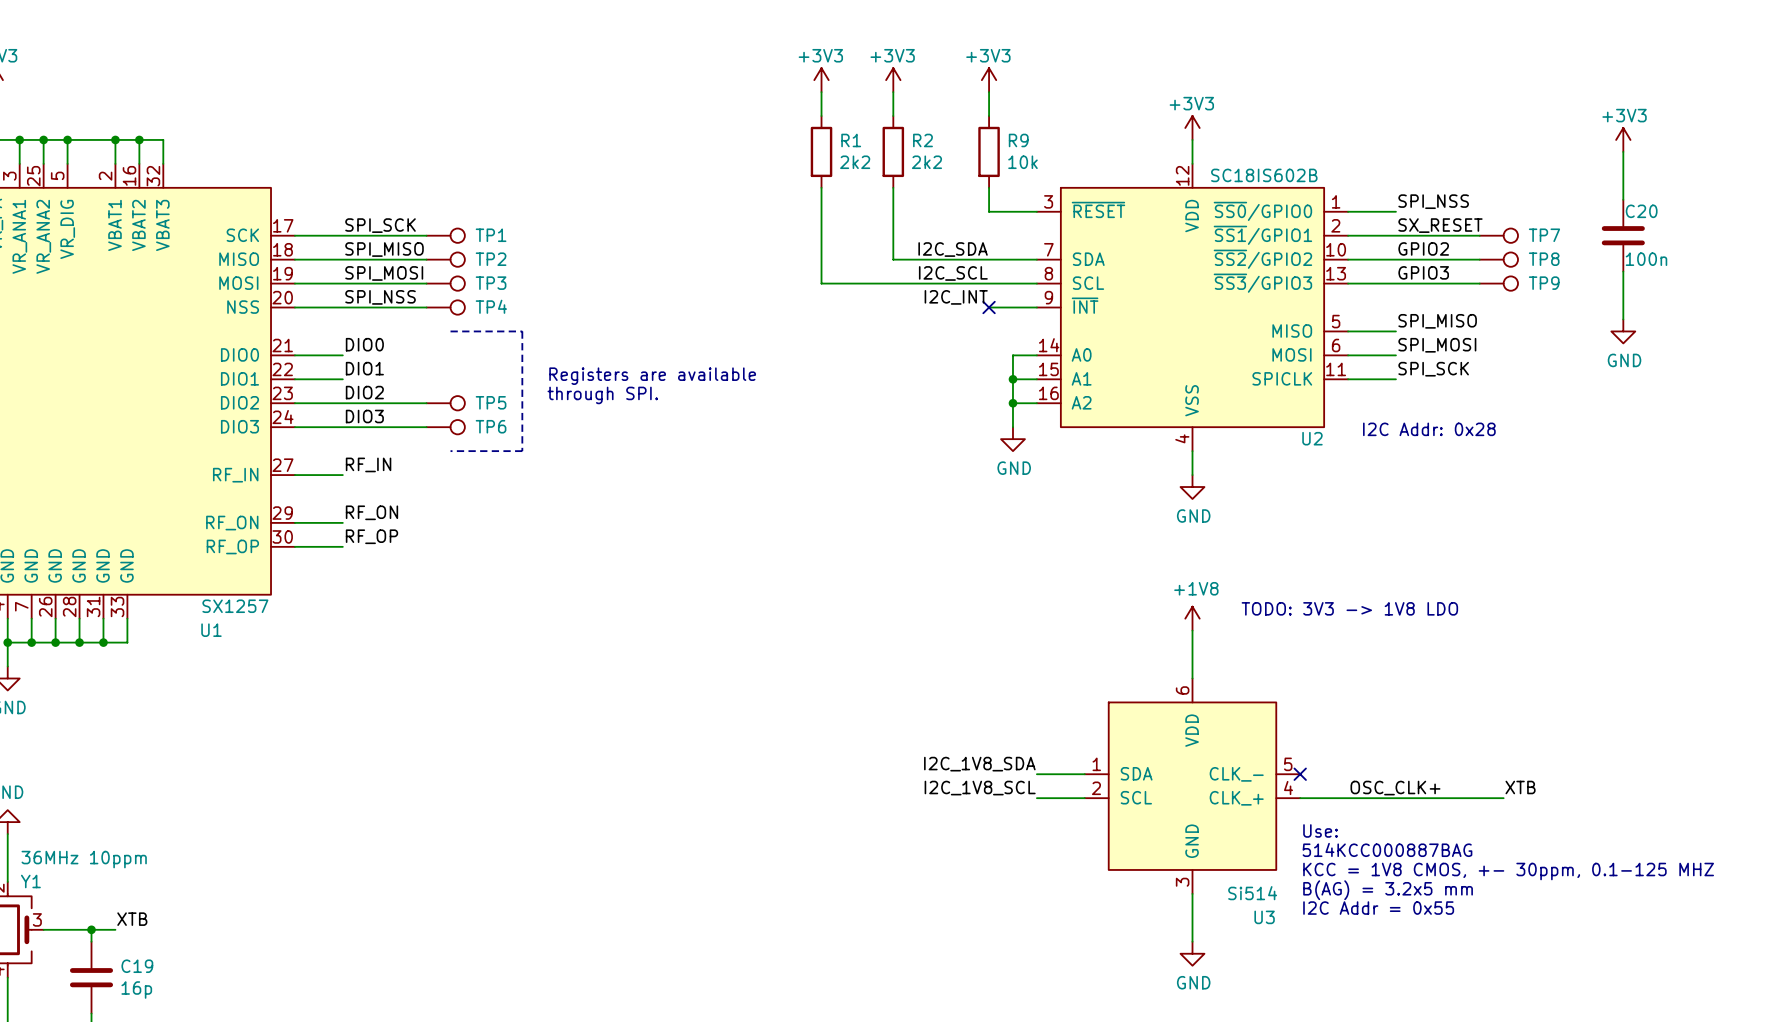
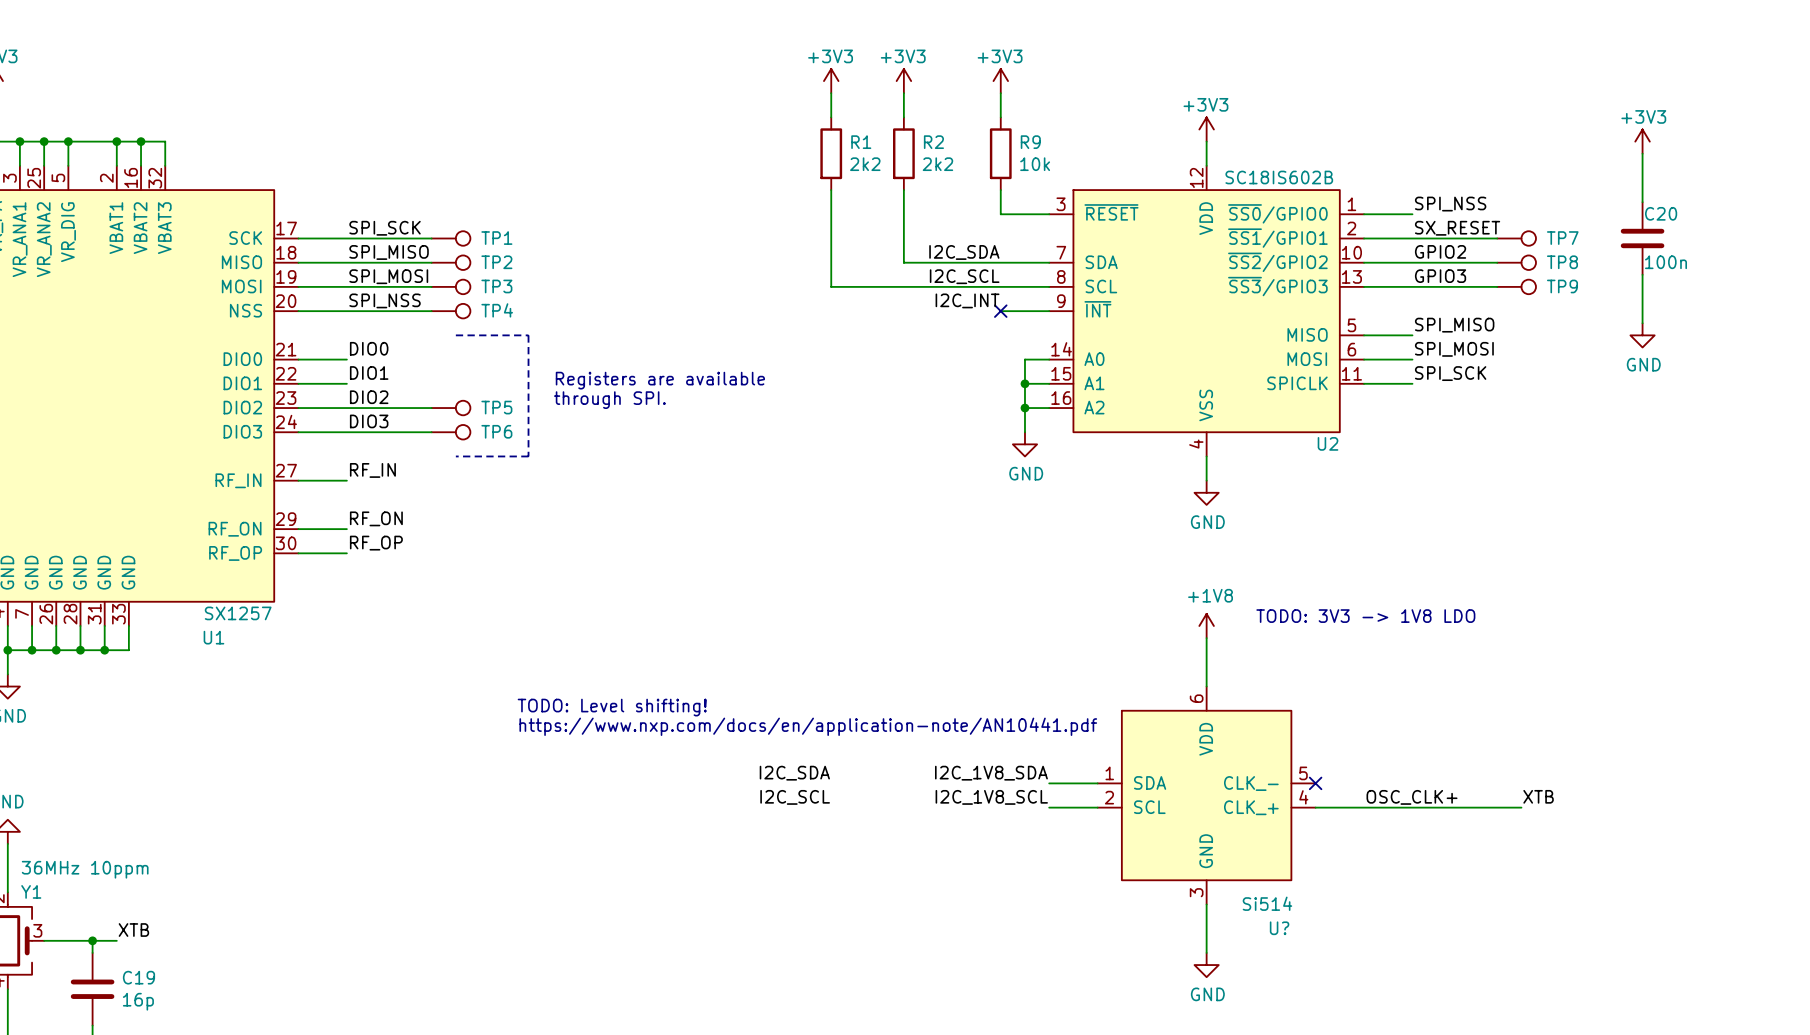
text: I2C Addr: 0x28 (1429, 429) -> none
text: none -> TODO: Level shifting! (612, 707)
text: none -> https://www.nxp.com/docs/en/application-note/AN10441.pdf (808, 726)
label: none -> I2C_SDA (794, 773)
label: none -> I2C_SCL (795, 797)
text: Use: (1320, 830) -> none
text: 514KCC000887BAG (1387, 849) -> none
text: KCC = 1V8 CMOS, +- 30ppm, 0.1-125 MHZ (1508, 871) -> none
text: B(AG) = 3.2x5 mm (1388, 890) -> none
text: I2C Addr = 0x55 (1378, 908) -> none
U3 name: U3 (1264, 917) -> U? (1279, 928)

